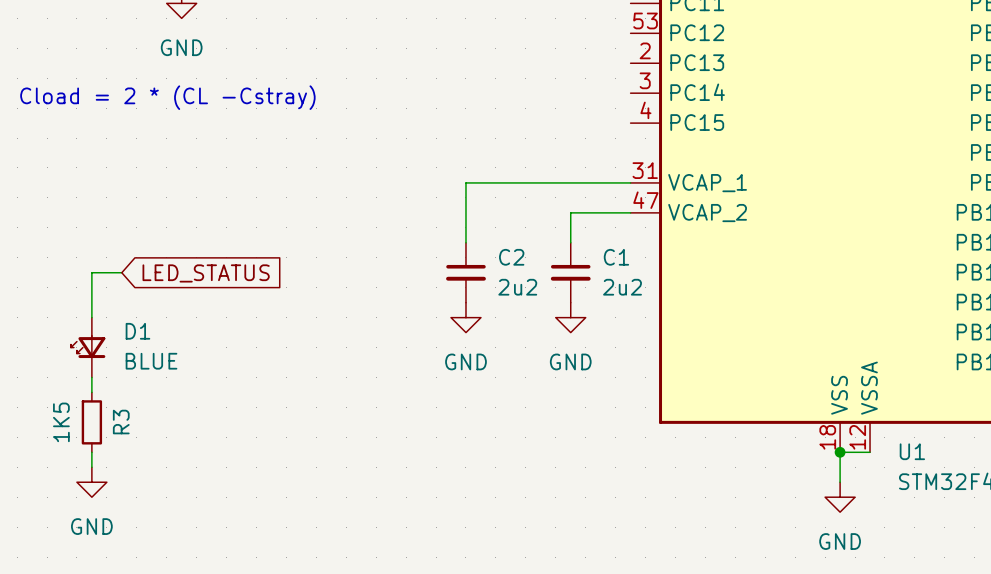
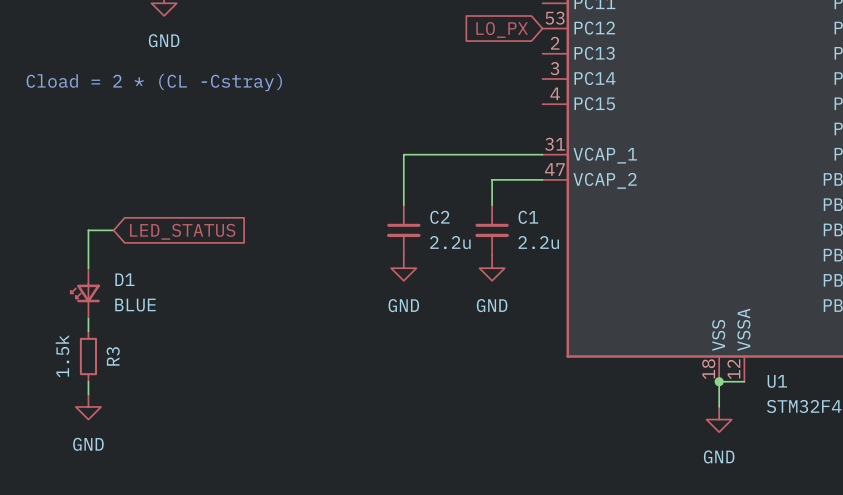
global label: none -> LO_PX (502, 29)
C2 value: 2u2 (517, 287) -> 2.2u (450, 242)
C1 value: 2u2 (622, 287) -> 2.2u (538, 242)
R3 value: 1K5 (61, 422) -> 1.5k (62, 356)

